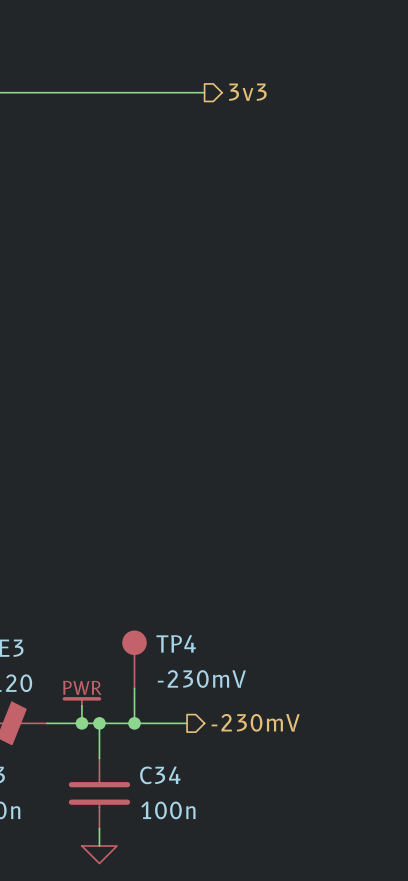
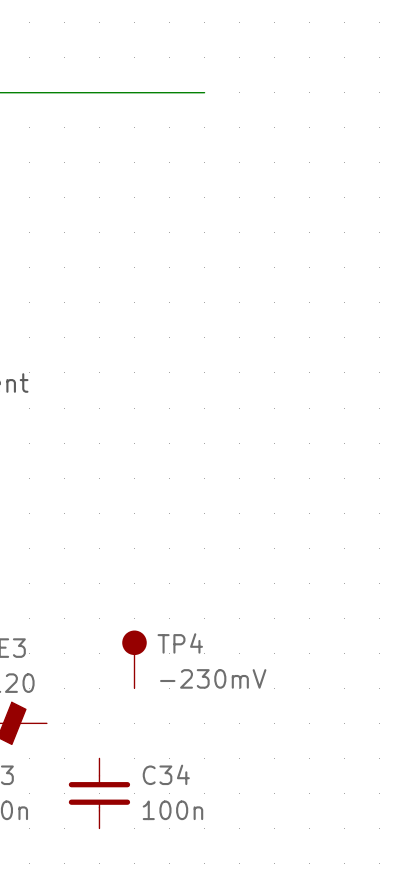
hierarchical label: 3v3 (247, 92) -> none
wire: (134, 688) (134, 723) -> none
power symbol: (81, 701) -> none
wire: (81, 705) (81, 723) -> none
hierarchical label: -230mV (255, 722) -> none
wire: (46, 723) (187, 723) -> none
junction: (81, 723) -> none
wire: (99, 723) (99, 758) -> none
junction: (99, 723) -> none
junction: (134, 723) -> none
wire: (99, 828) (99, 846) -> none
power symbol: (99, 854) -> none

